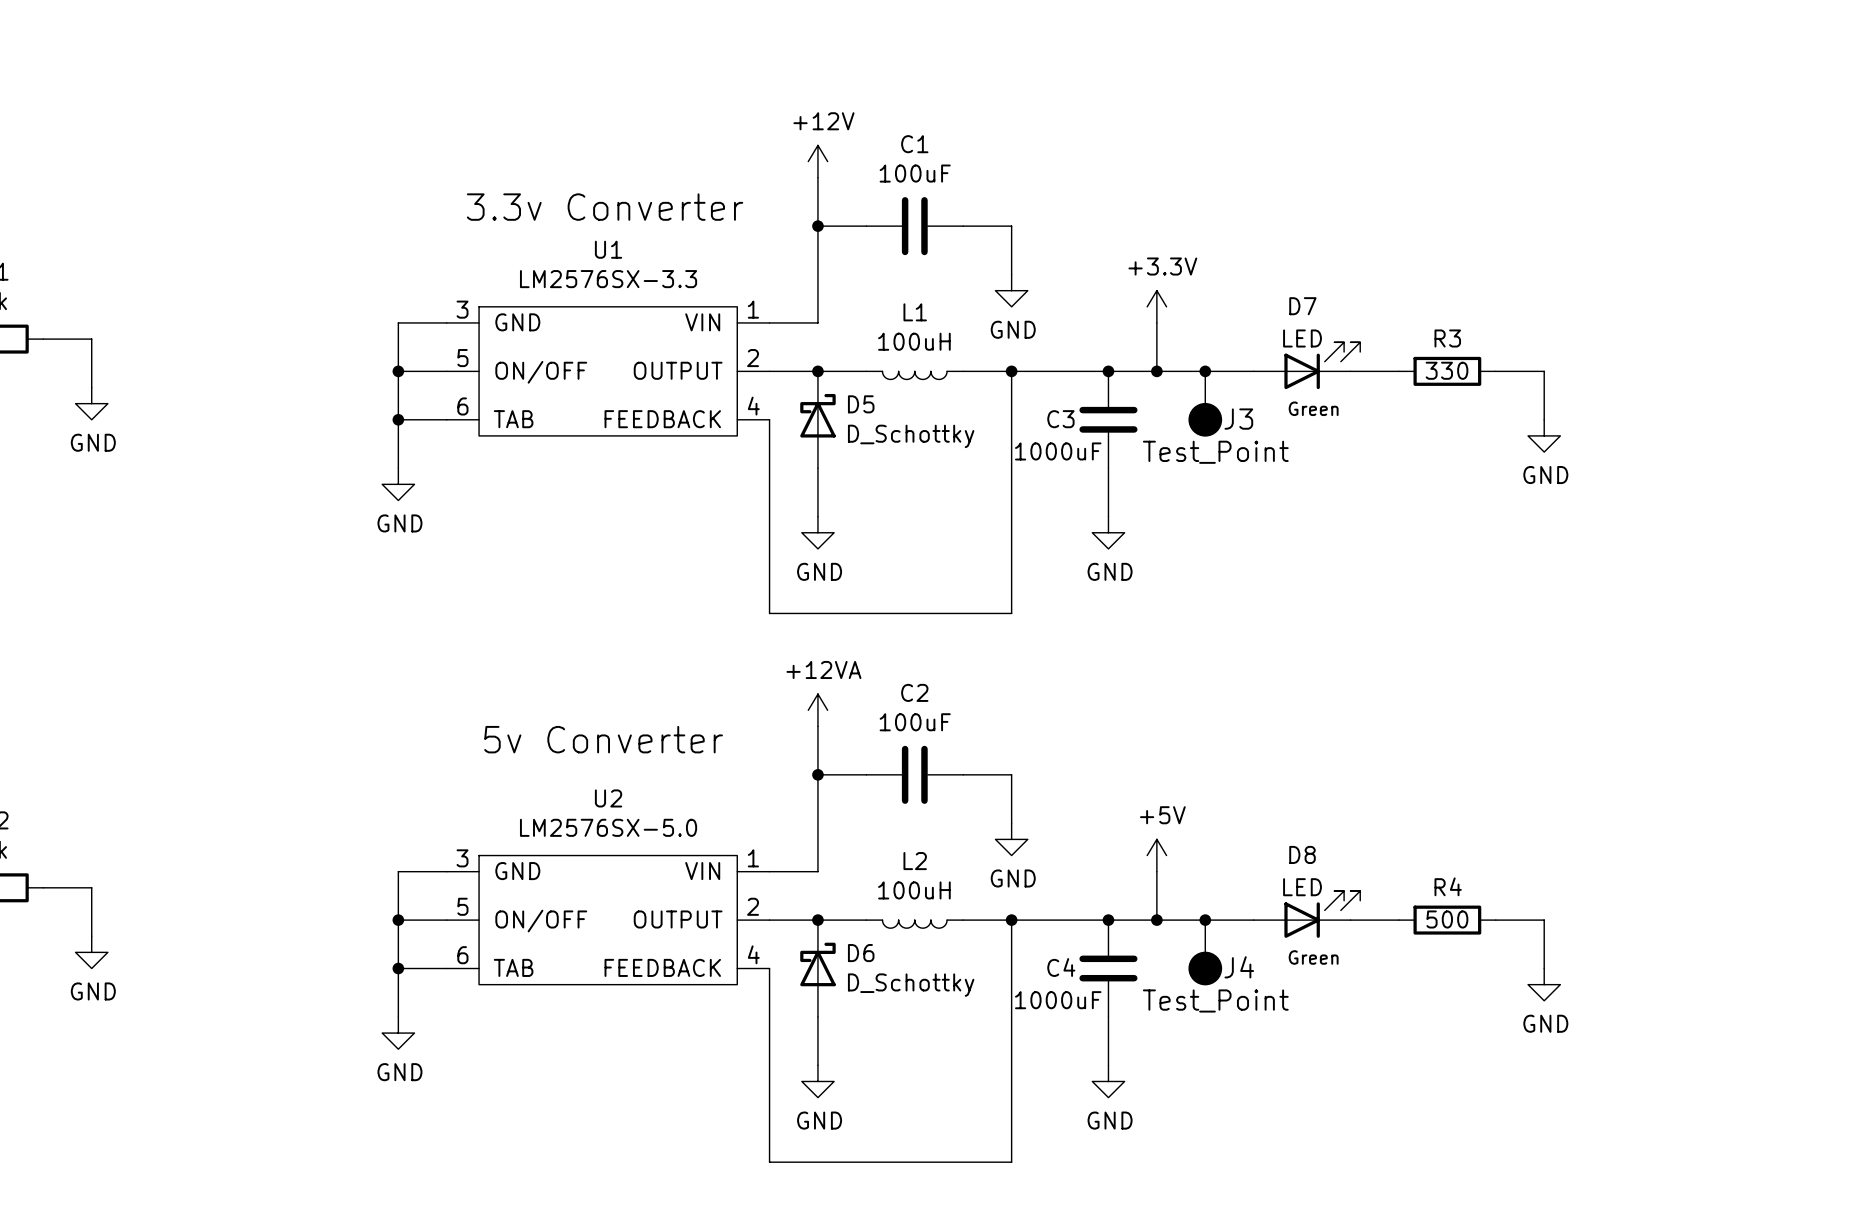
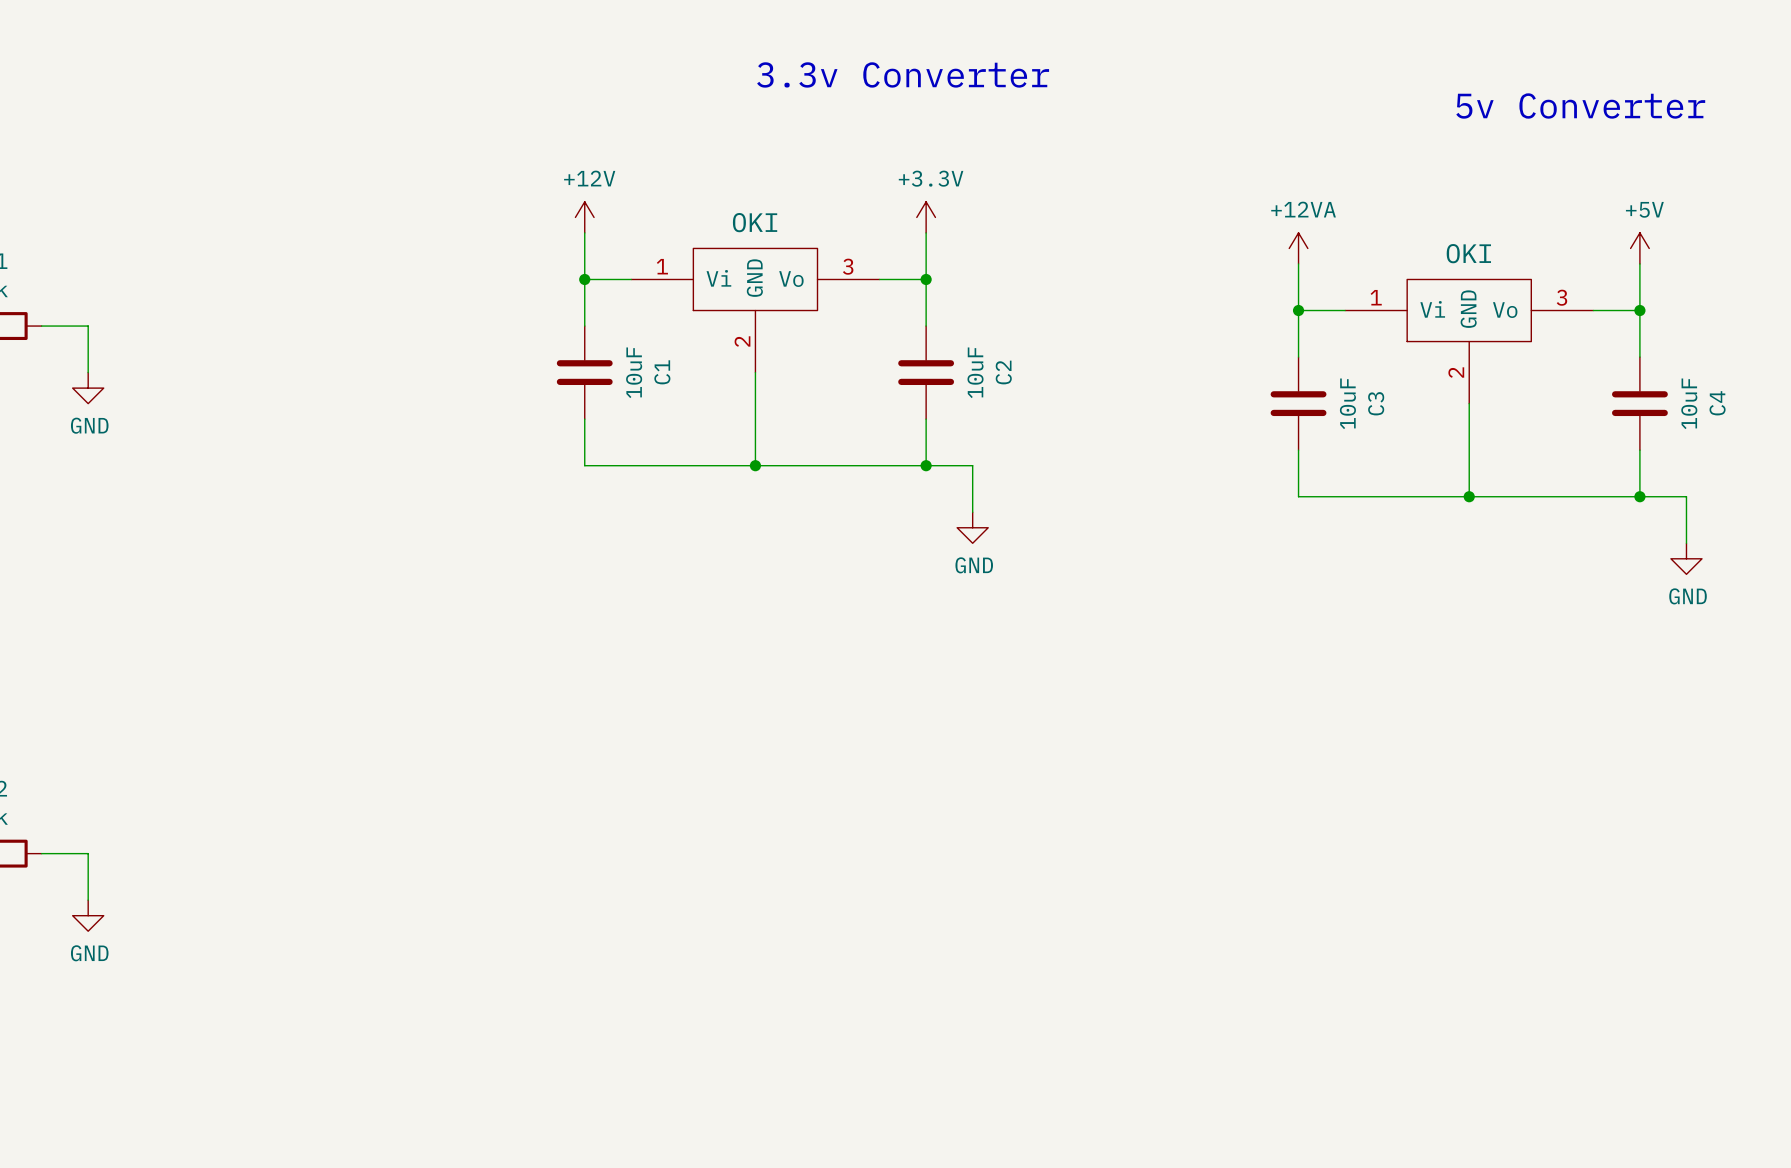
text: none -> 3.3v Converter (903, 74)
text: none -> 5v Converter (1580, 106)
power symbol position: +12V (817, 161) -> +12V (584, 217)
C1 value: 100uF (915, 173) -> 10uF (634, 372)
wire: (817, 177) (817, 322) (769, 322) -> none
text: 3.3v Converter (605, 207) -> none
wire: (817, 226) (866, 226) -> (879, 279) (926, 279)
junction: (817, 226) -> none
C1 rotation: 0° (914, 226) -> 90° clockwise (584, 372)
C1 position: (914, 226) -> (584, 372)
wire: (963, 226) (1011, 226) (1011, 274) -> none
wire: none -> (584, 232) (584, 326)
wire: none -> (926, 232) (926, 326)
power symbol: none -> +12VA (1298, 248)
power symbol: none -> +5V (1639, 248)
wire: none -> (1639, 263) (1639, 357)
junction: none -> (584, 279)
junction: none -> (926, 279)
power symbol: GND (1011, 290) -> none
power symbol position: +3.3V (1156, 306) -> +3.3V (926, 217)
wire: (446, 322) (398, 322) (398, 468) -> none
part: none -> OKI (755, 310)
wire: (1156, 322) (1156, 371) -> none
wire: none -> (1298, 310) (1345, 310)
junction: none -> (1298, 310)
wire: none -> (1593, 310) (1639, 310)
junction: none -> (1639, 310)
part: none -> OKI (1469, 341)
D7: LED (1306, 365) -> none
wire: (398, 371) (446, 371) -> (584, 279) (631, 279)
junction: (398, 371) -> none
U1: LM2576SX-3.3 (608, 371) -> none
wire: (769, 371) (866, 371) -> none
junction: (817, 371) -> none
wire: (963, 371) (1253, 371) -> none
wire: (1011, 371) (1011, 484) -> (584, 419) (584, 465) (972, 465)
junction: (1011, 371) -> none
junction: (1108, 371) -> none
junction: (1156, 371) -> none
junction: (1205, 371) -> none
wire: (1350, 371) (1398, 371) -> (1298, 357) (1298, 263)
R3: 330 (1447, 371) -> none
wire: (1495, 371) (1544, 371) (1544, 419) -> none
L1: 100uH (914, 375) -> none
wire: none -> (755, 372) (755, 465)
J3: Test_Point (1205, 403) -> none
text: Green (1313, 408) -> none
wire: (398, 419) (446, 419) -> none
junction: (398, 419) -> none
wire: (769, 419) (769, 613) (1011, 613) (1011, 532) -> none
D5: D_Schottky (817, 419) -> none
C3 name rotation: 0° (1060, 419) -> 90° counterclockwise (1376, 403)
C3 name position: C3 (1060, 419) -> C3 (1376, 403)
C3 position: (1108, 419) -> (1298, 403)
wire: none -> (1469, 403) (1469, 496)
power symbol: GND (1544, 435) -> none
C3 value: 1000uF (1058, 451) -> 10uF (1347, 403)
wire: (817, 468) (817, 516) -> (926, 419) (926, 465)
wire: (1108, 468) (1108, 516) -> none
wire: none -> (1298, 450) (1298, 496) (1686, 496) (1686, 543)
wire: none -> (1639, 450) (1639, 496)
power symbol: GND (398, 484) -> none
junction: none -> (755, 465)
junction: none -> (926, 465)
junction: none -> (1469, 496)
junction: none -> (1639, 496)
power symbol: GND (817, 532) -> none
power symbol: GND (1108, 532) -> none
power symbol: none -> GND (972, 527)
power symbol: none -> GND (1686, 558)
power symbol: +12VA (817, 710) -> none
C2 value: 100uF (915, 722) -> 10uF (975, 372)
wire: (817, 726) (817, 871) (769, 871) -> none
text: 5v Converter (603, 739) -> none
wire: (817, 774) (866, 774) -> none
junction: (817, 774) -> none
C2 rotation: 0° (914, 774) -> 90° clockwise (926, 372)
C2 position: (914, 774) -> (926, 372)
wire: (963, 774) (1011, 774) (1011, 823) -> none
power symbol: GND (1011, 839) -> none
power symbol: +5V (1156, 855) -> none
wire: (446, 871) (398, 871) (398, 1016) -> none
wire: (1156, 871) (1156, 920) -> none
D8: LED (1306, 914) -> none
wire: (398, 920) (446, 920) -> none
junction: (398, 920) -> none
U2: LM2576SX-5.0 (608, 920) -> none
wire: (769, 920) (866, 920) -> none
junction: (817, 920) -> none
wire: (963, 920) (1253, 920) -> none
wire: (1011, 920) (1011, 1162) (769, 1162) (769, 968) -> none
junction: (1011, 920) -> none
junction: (1108, 920) -> none
junction: (1156, 920) -> none
junction: (1205, 920) -> none
wire: (1350, 920) (1398, 920) -> none
R4: 500 (1447, 920) -> none
wire: (1495, 920) (1544, 920) (1544, 968) -> none
L2: 100uH (914, 924) -> none
J4: Test_Point (1205, 952) -> none
text: Green (1313, 957) -> none
C4 name rotation: 0° (1061, 967) -> 90° counterclockwise (1717, 403)
C4 name position: C4 (1061, 967) -> C4 (1717, 403)
wire: (398, 968) (446, 968) -> none
junction: (398, 968) -> none
D6: D_Schottky (817, 968) -> none
C4 position: (1108, 968) -> (1639, 403)
power symbol: GND (1544, 984) -> none
C4 value: 1000uF (1058, 1000) -> 10uF (1689, 403)
wire: (817, 1016) (817, 1065) -> none
wire: (1108, 1016) (1108, 1065) -> none
power symbol: GND (398, 1033) -> none
power symbol: GND (817, 1081) -> none
power symbol: GND (1108, 1081) -> none

